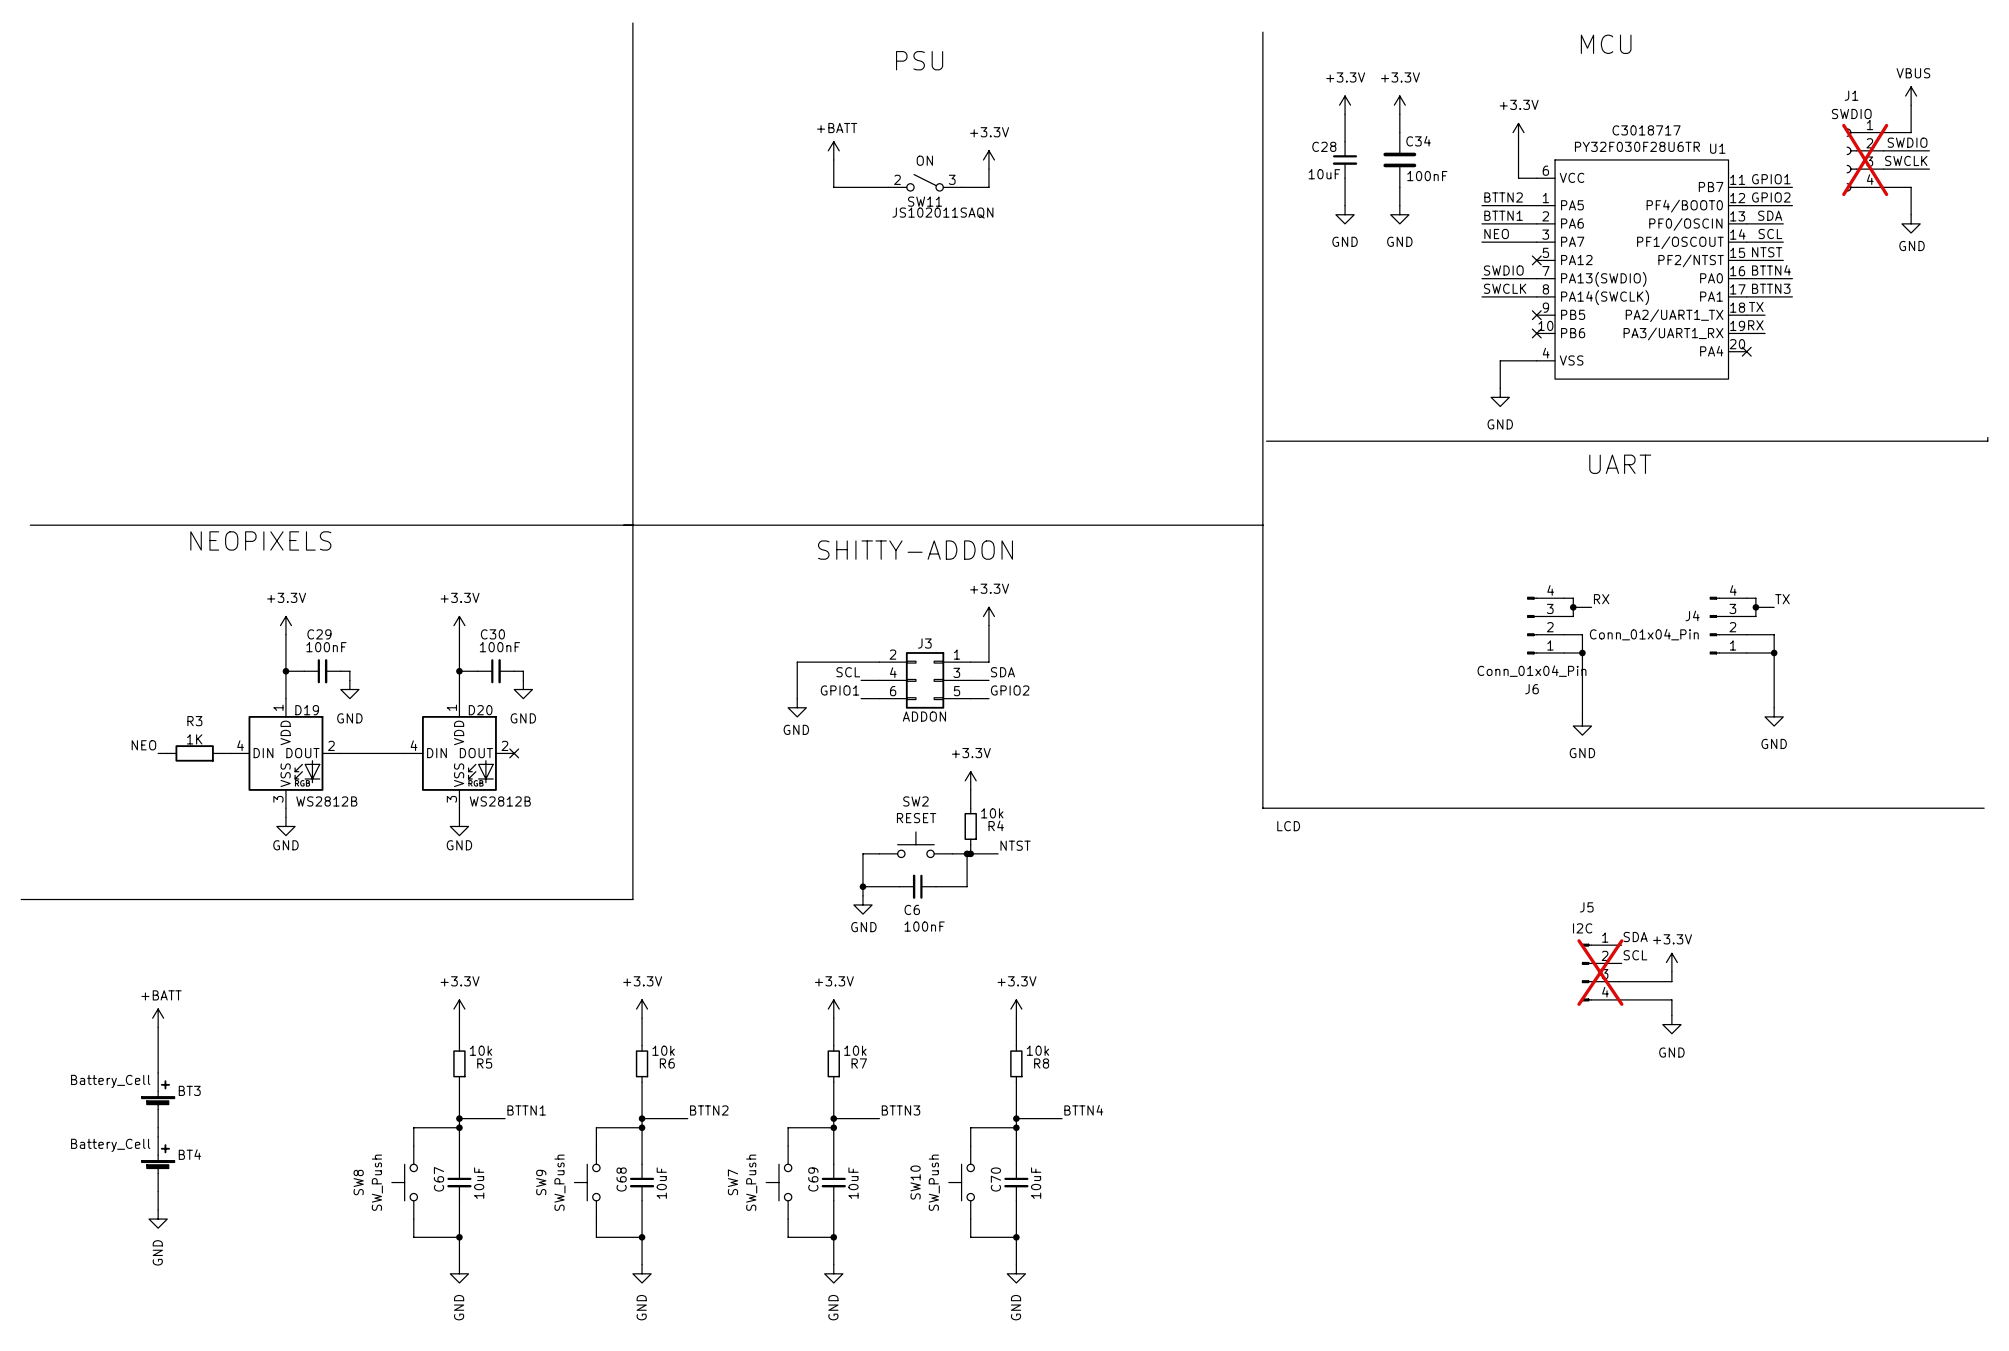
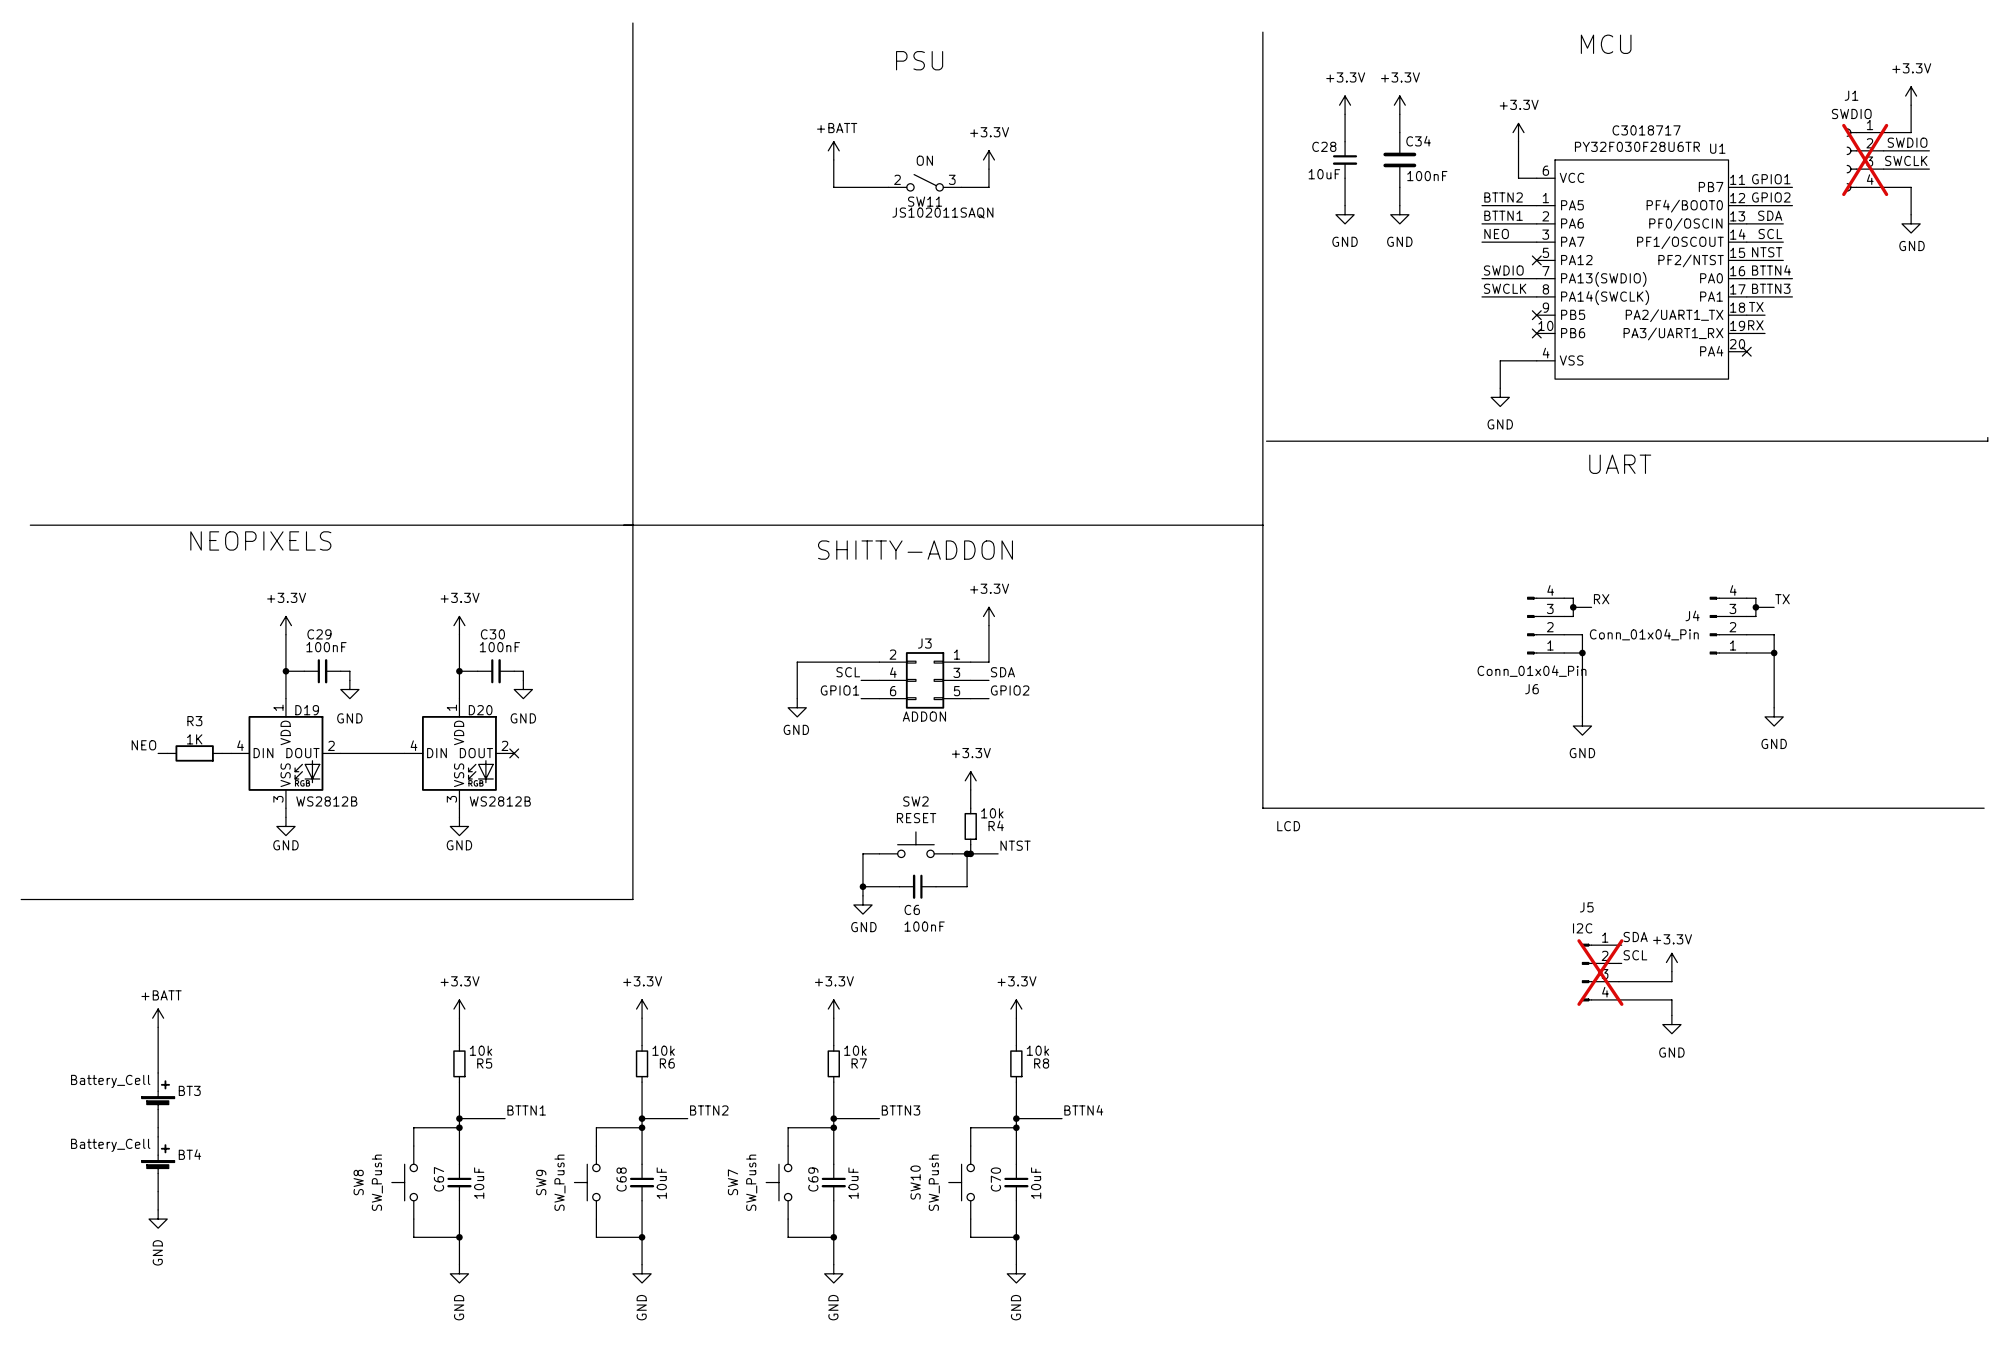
power symbol: VBUS (1911, 96) -> +3.3V (1911, 96)

